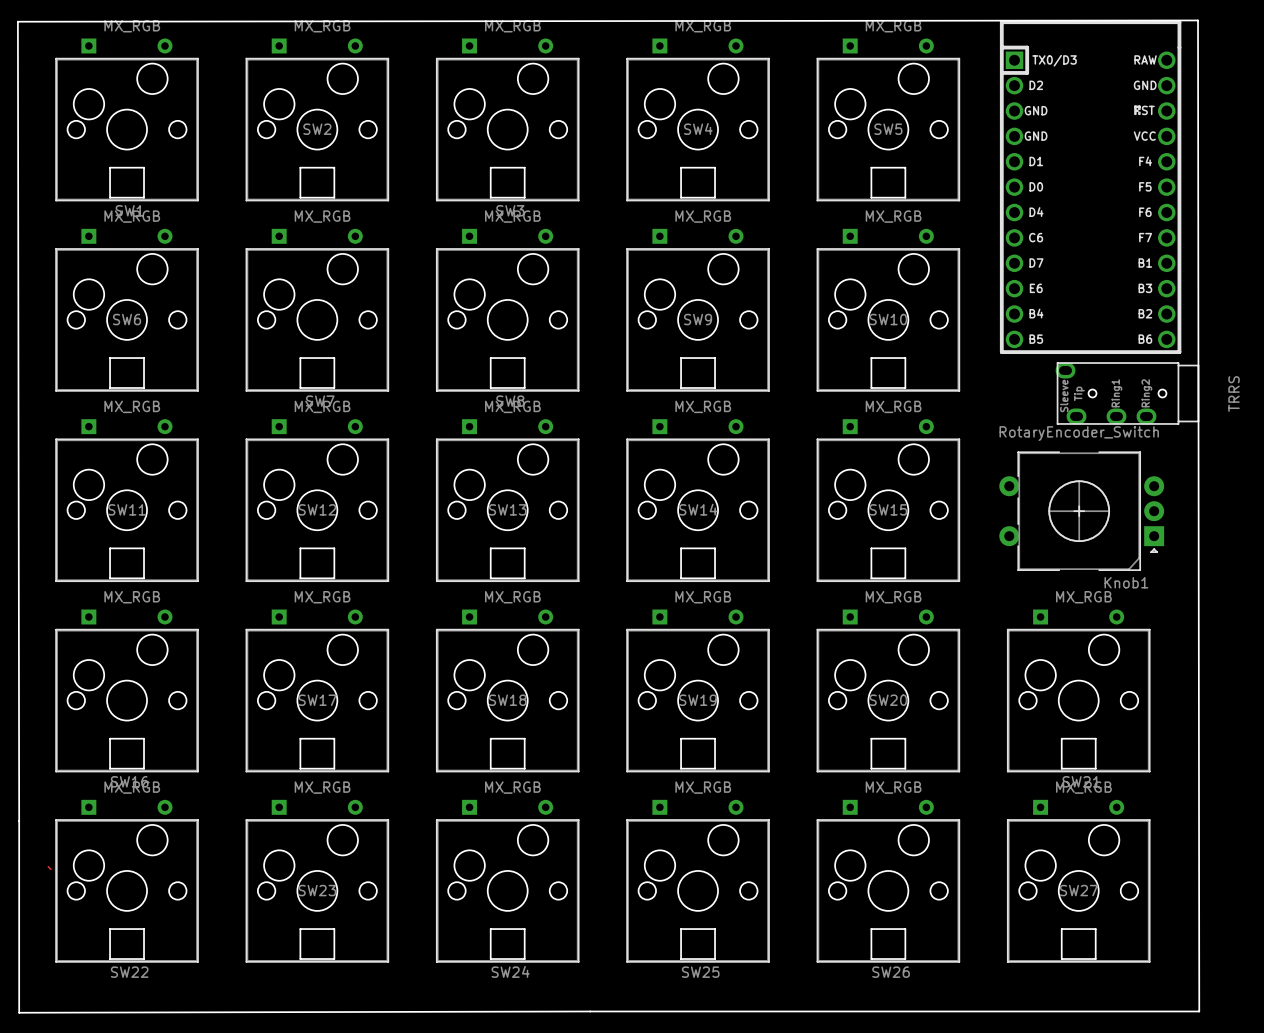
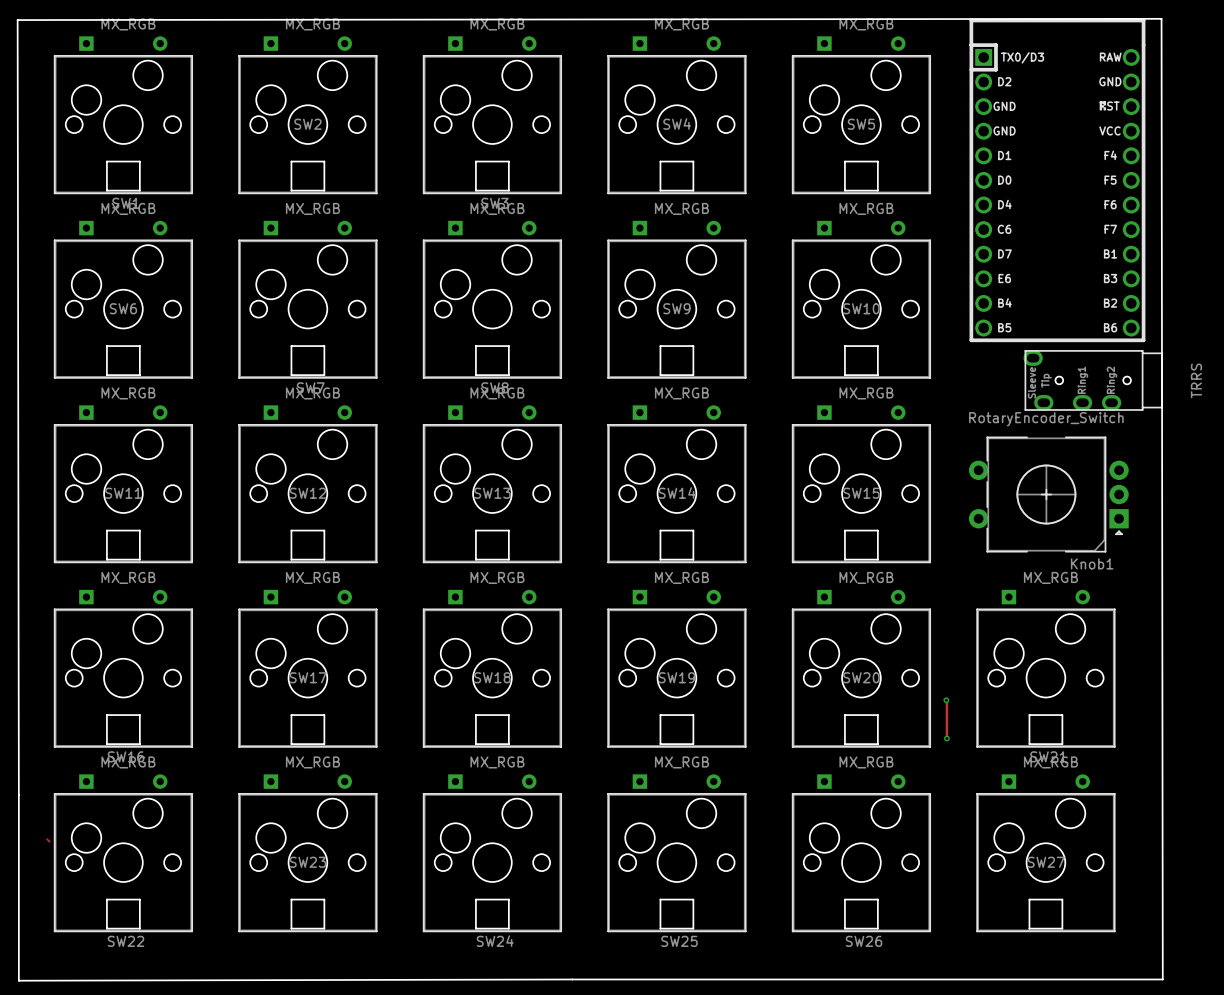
track: none -> (946, 700) (946, 738)
via: none -> (946, 700)
via: none -> (946, 738)

